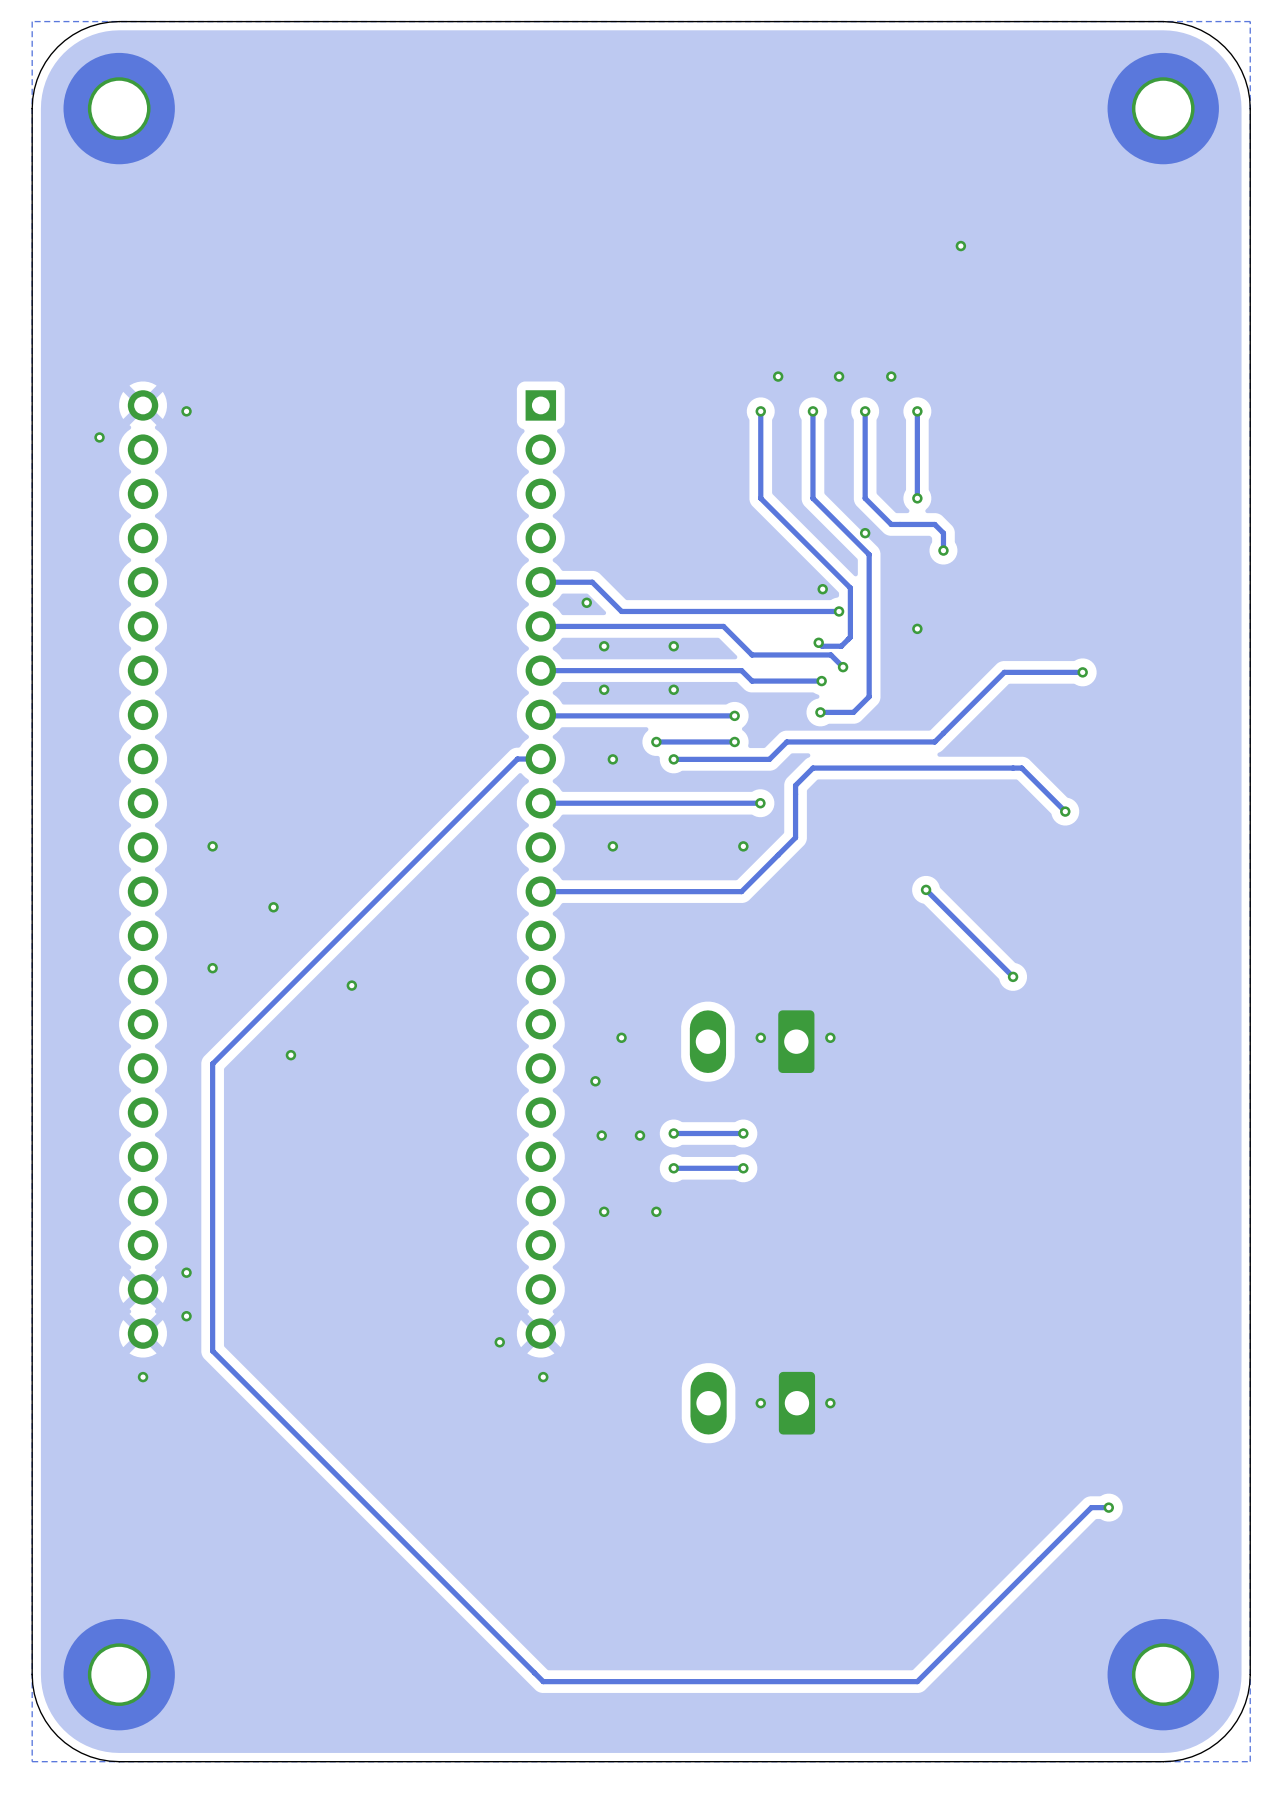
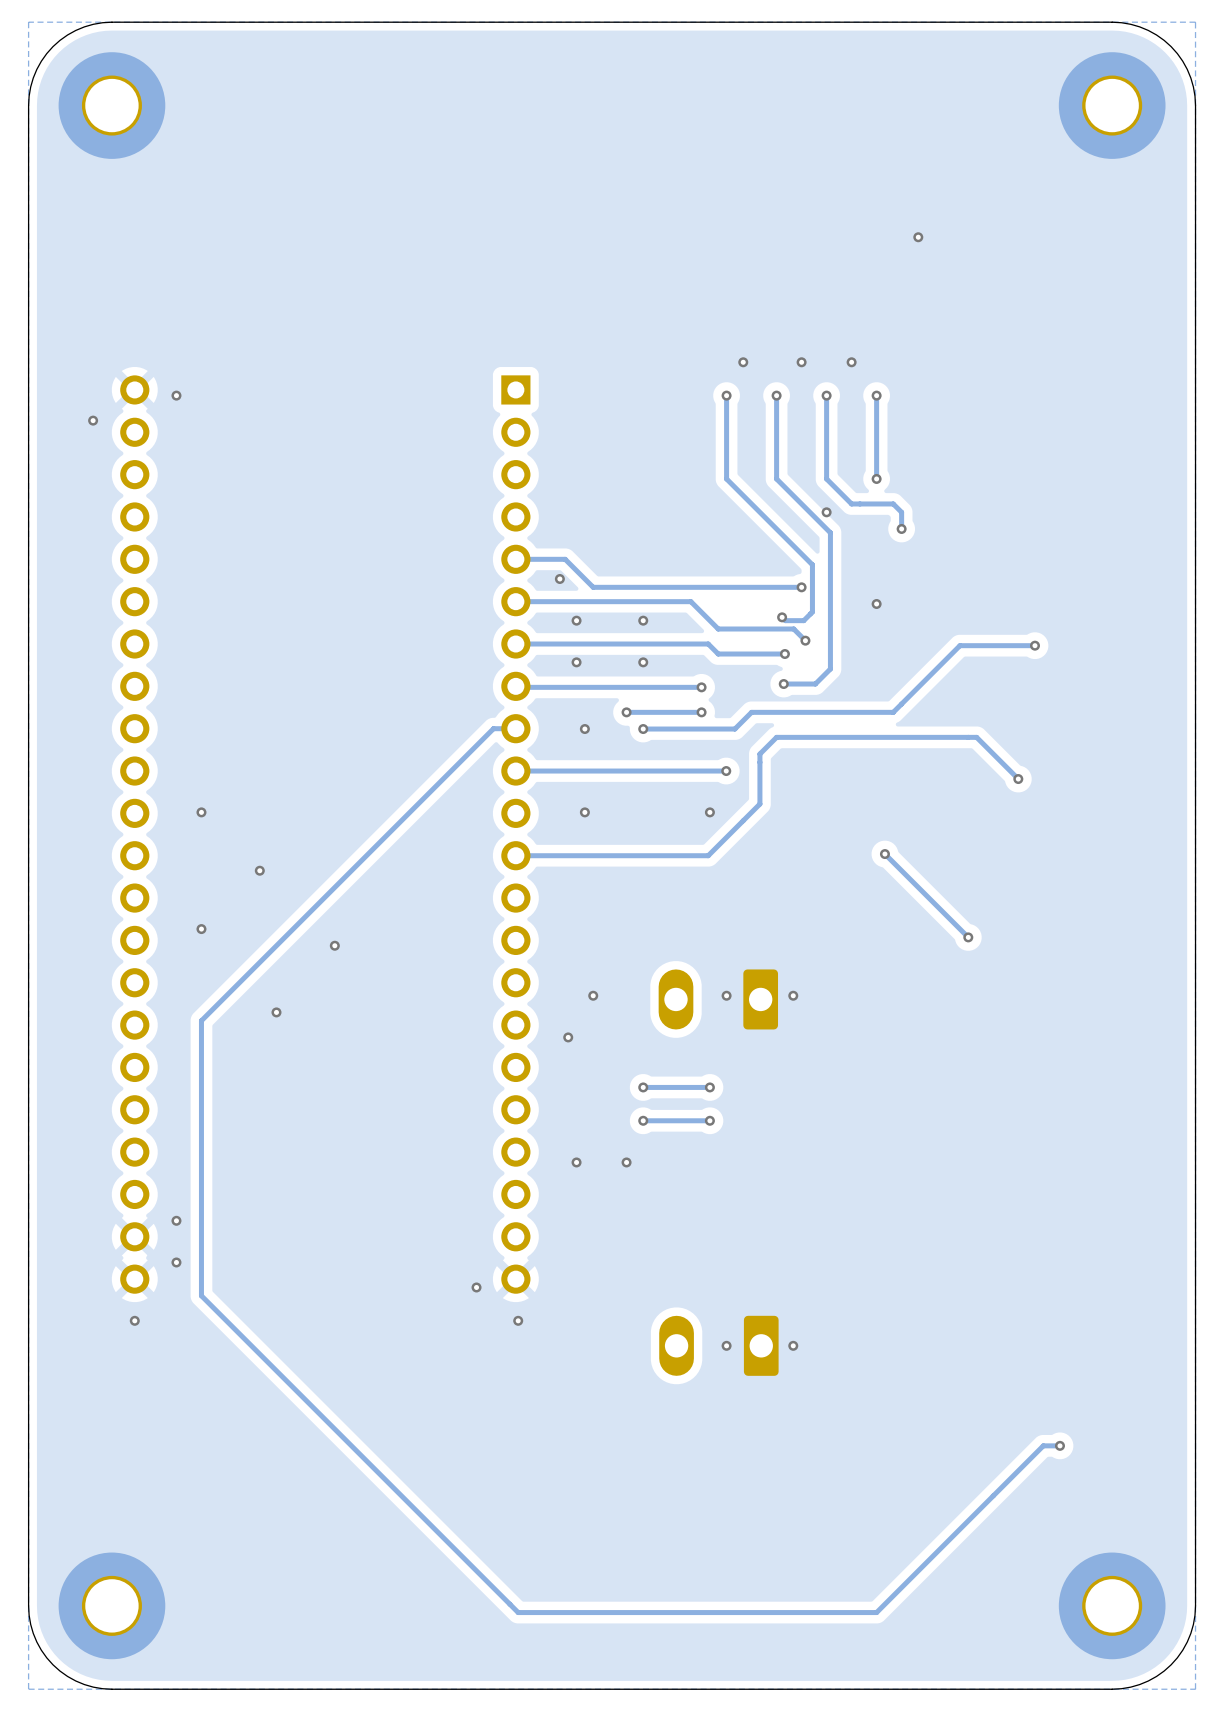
via: (822, 589) -> none
via: (601, 1135) -> none
via: (640, 1135) -> none

